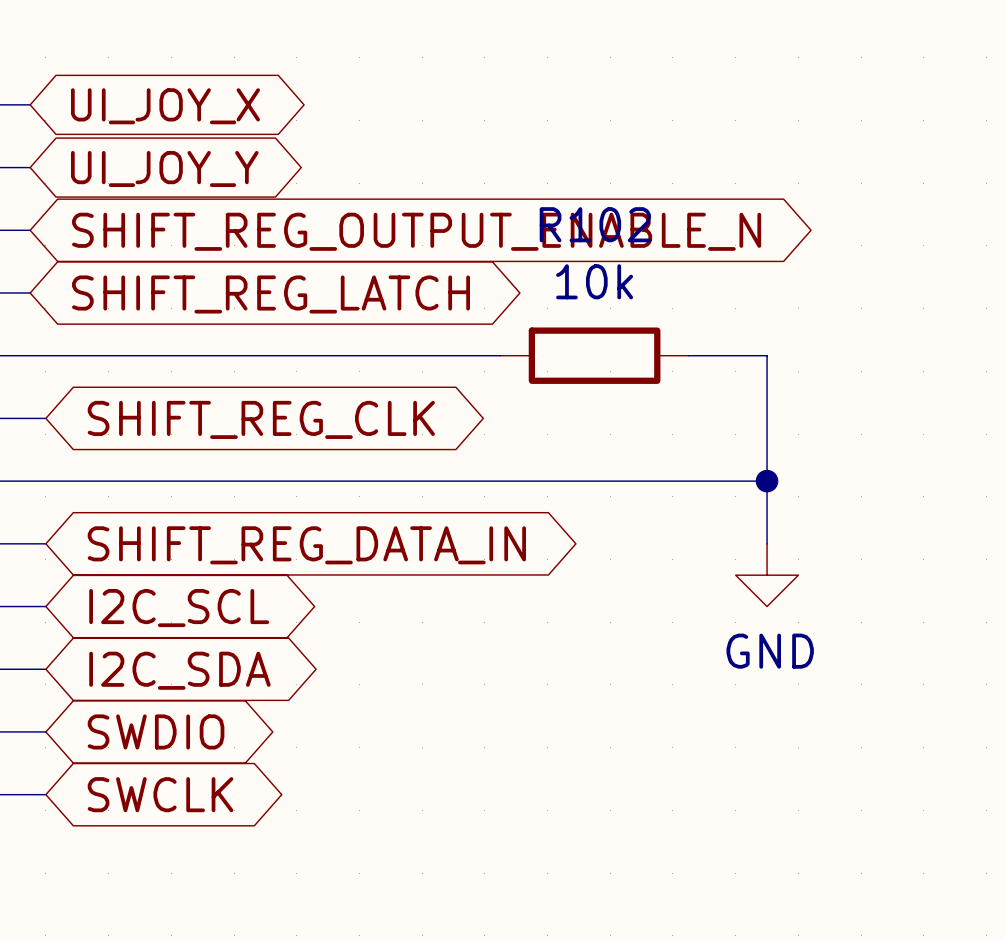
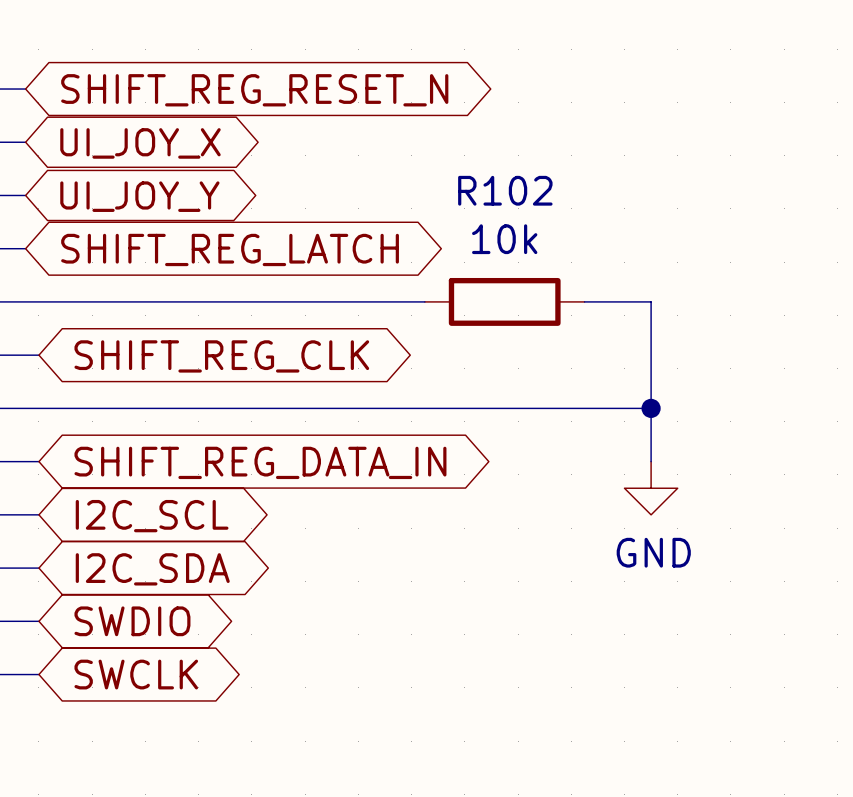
global label: UI_JOY_X (165, 106) -> SHIFT_REG_RESET_N (254, 90)
global label: UI_JOY_Y (164, 168) -> UI_JOY_X (140, 143)
global label: SHIFT_REG_OUTPUT_ENABLE_N (416, 231) -> UI_JOY_Y (139, 196)

